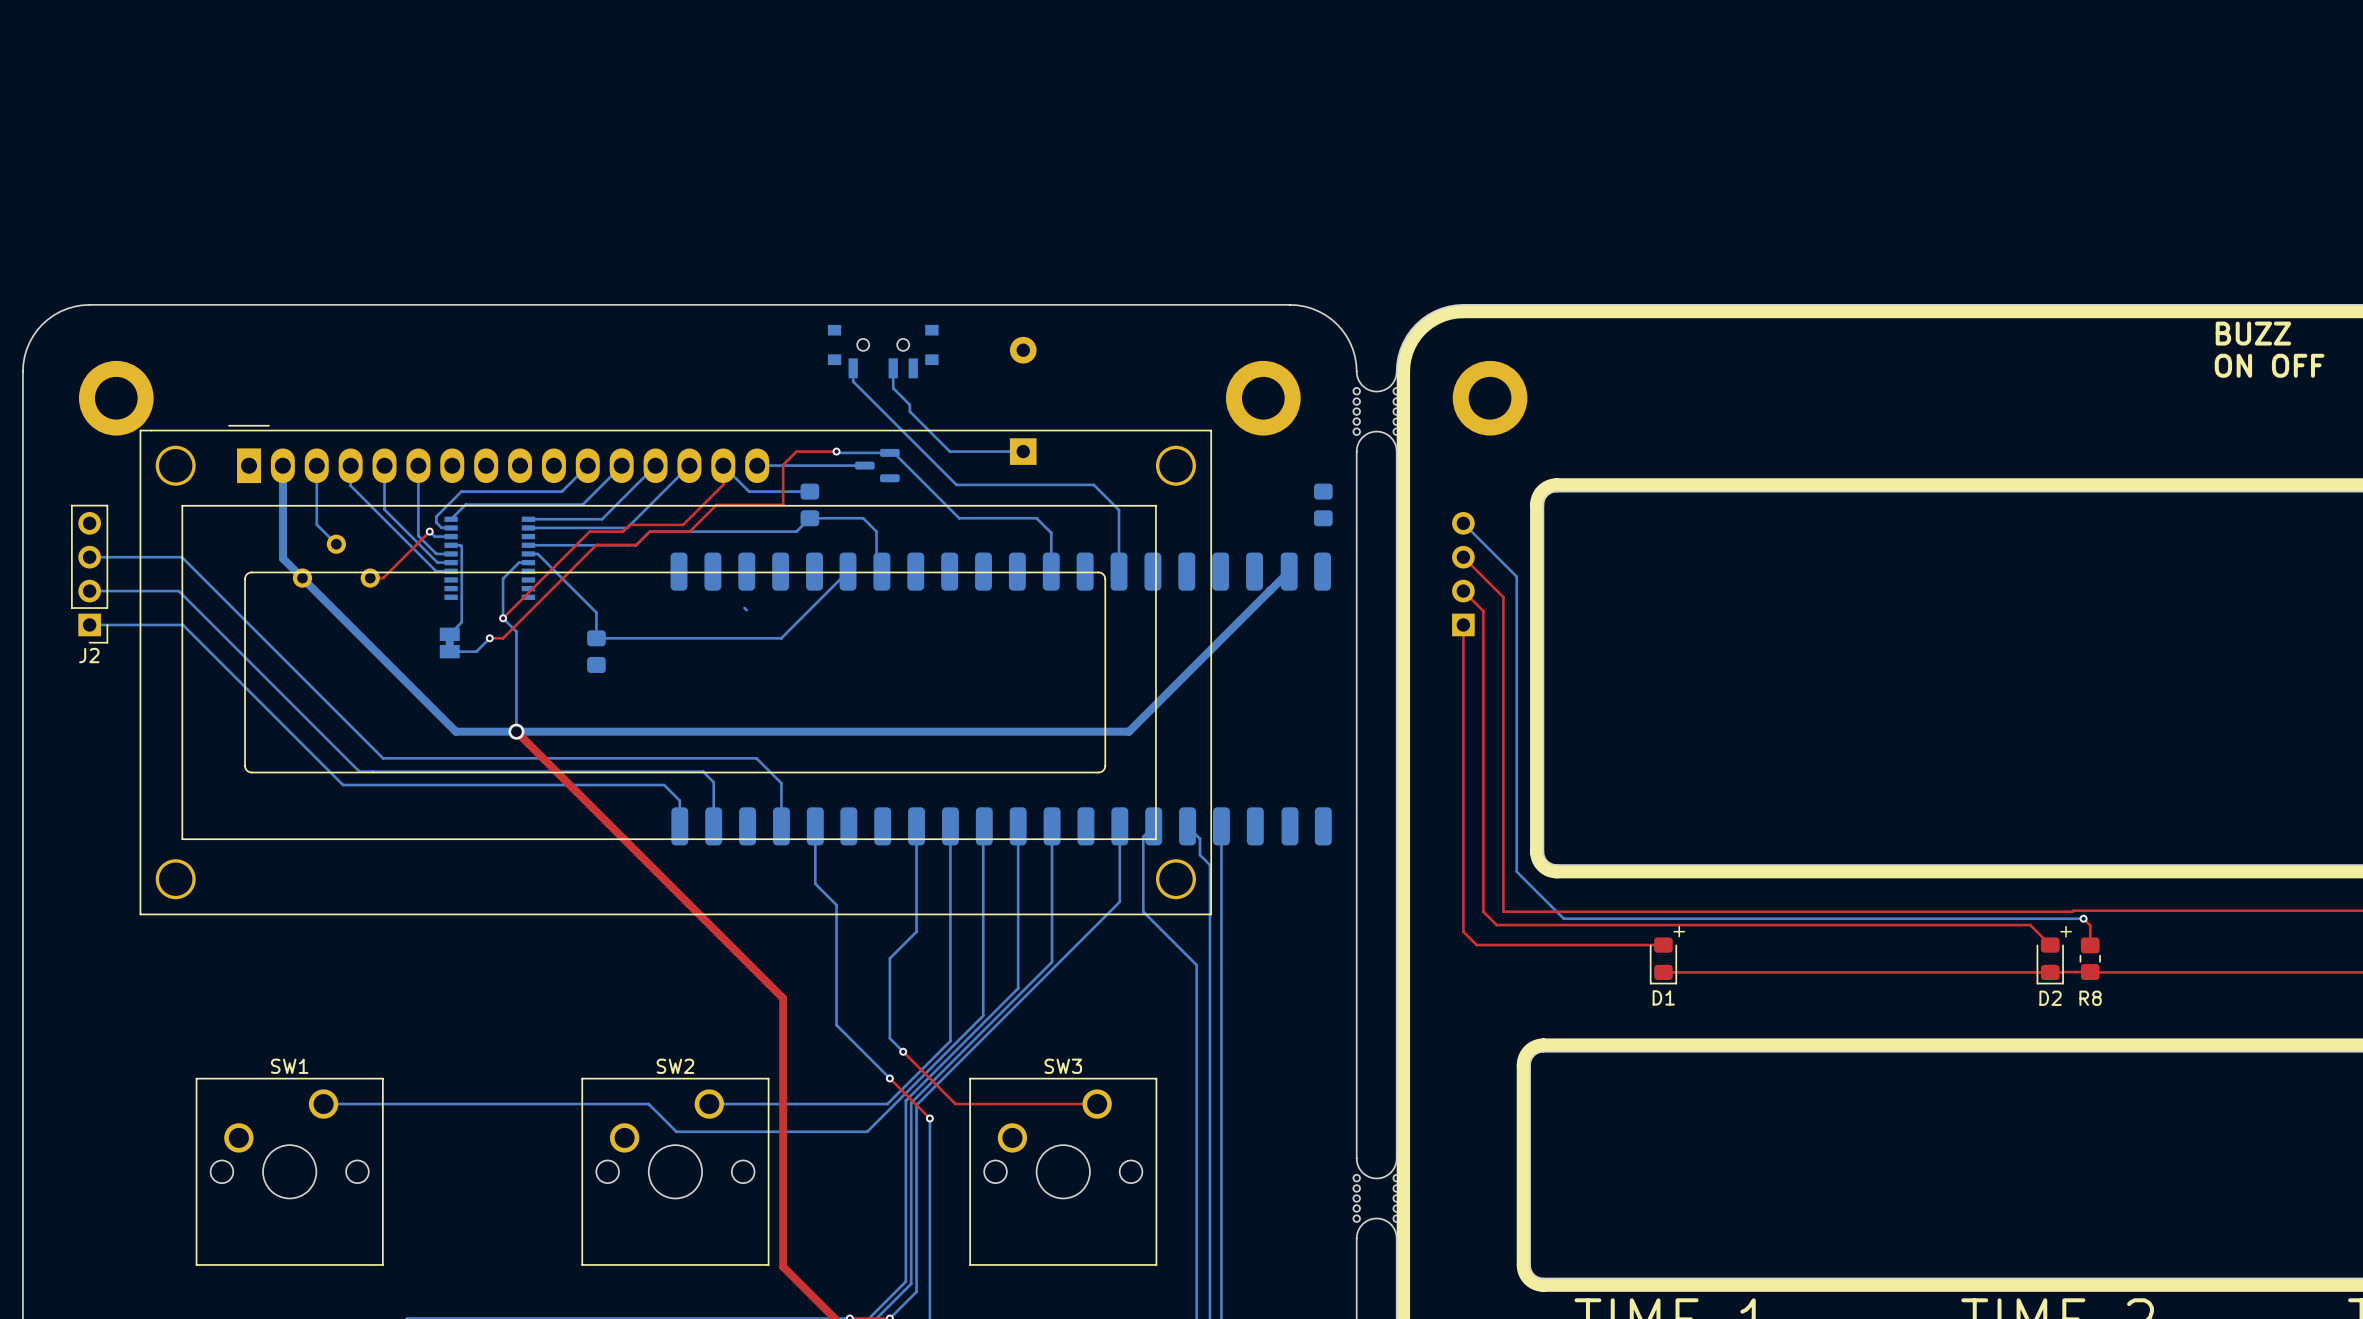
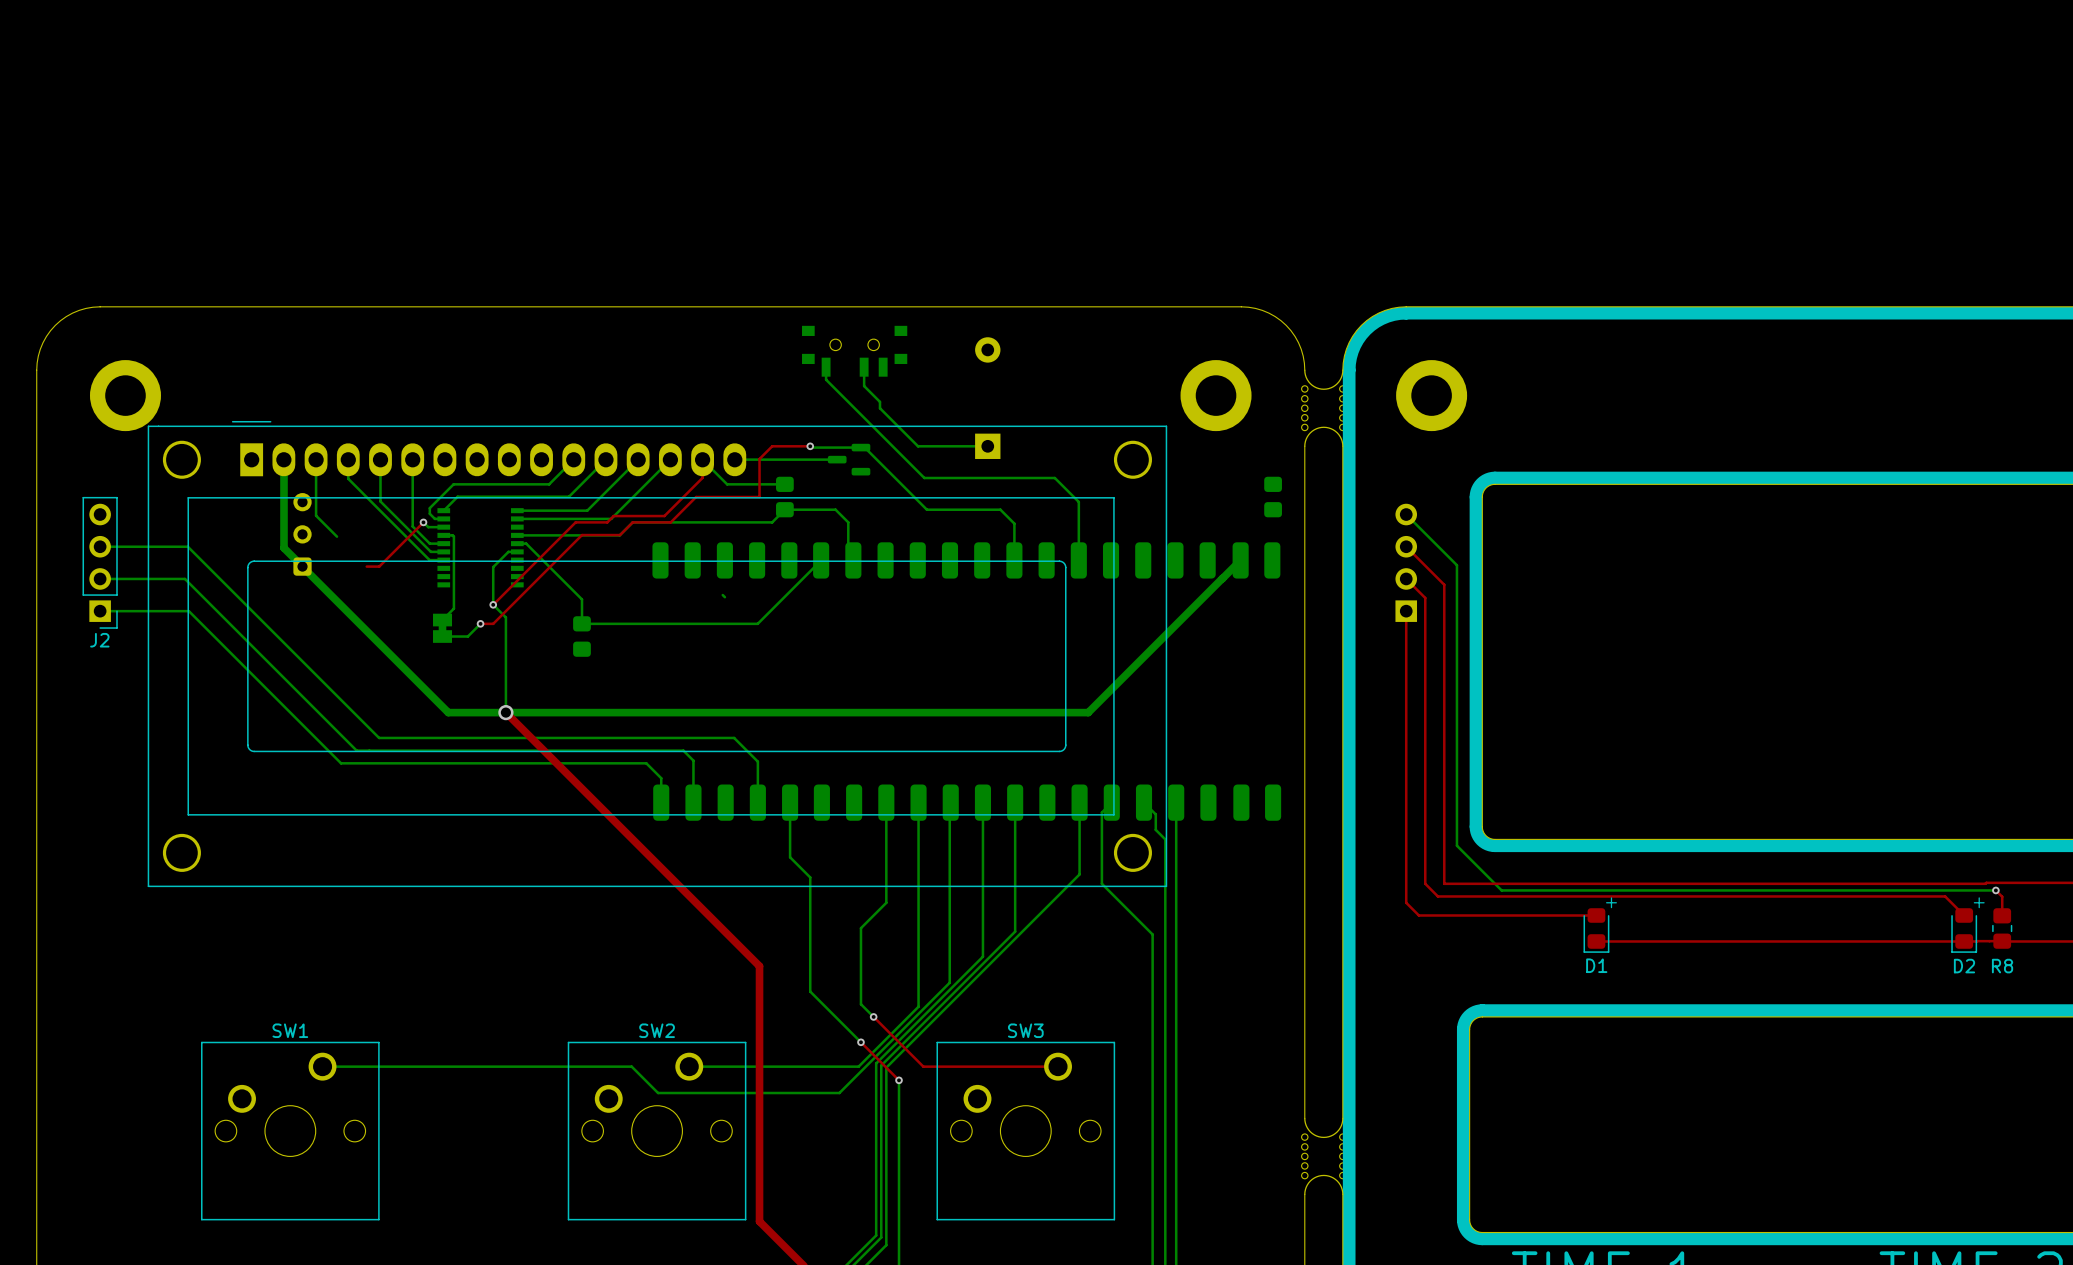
part: none -> (302, 534)
part: (336, 561) -> none

